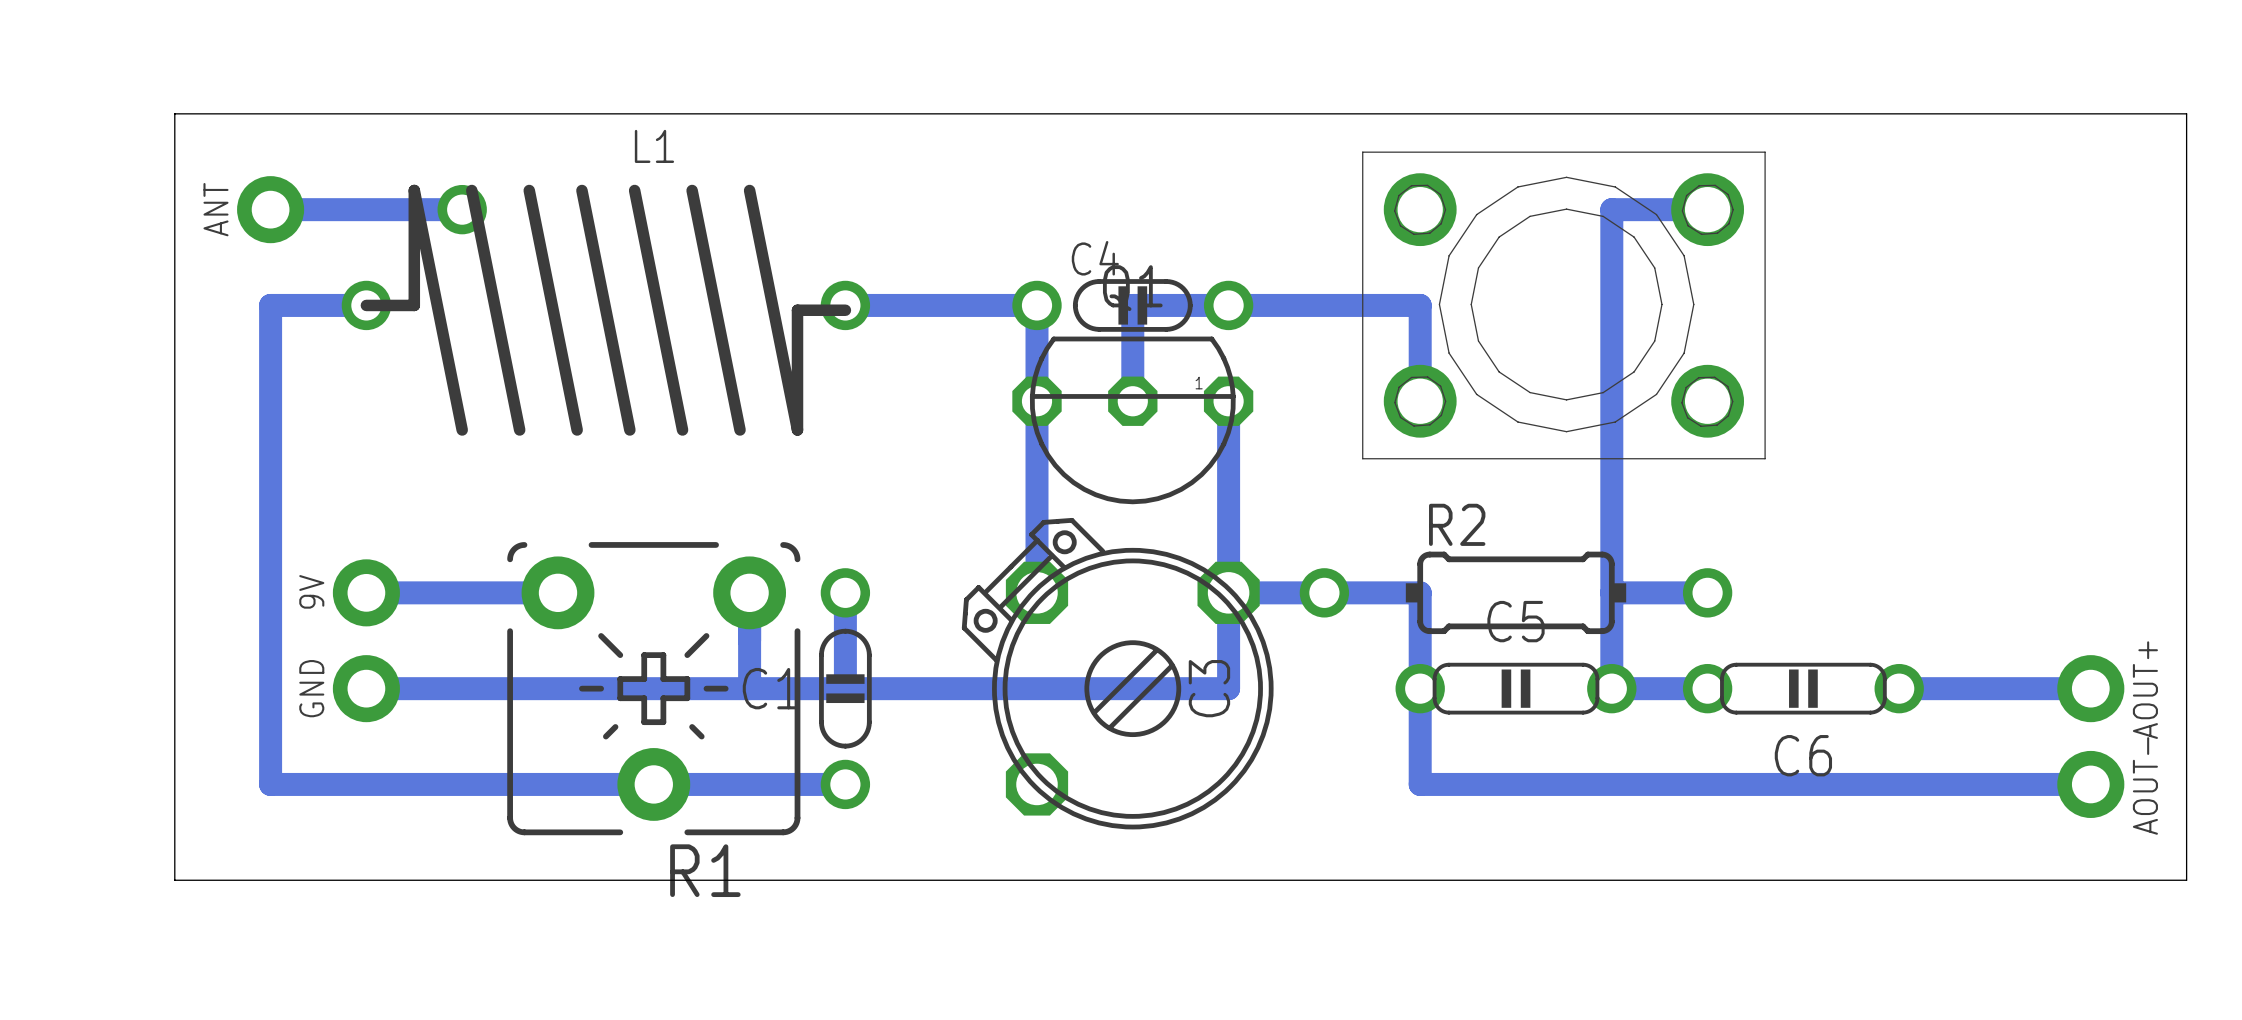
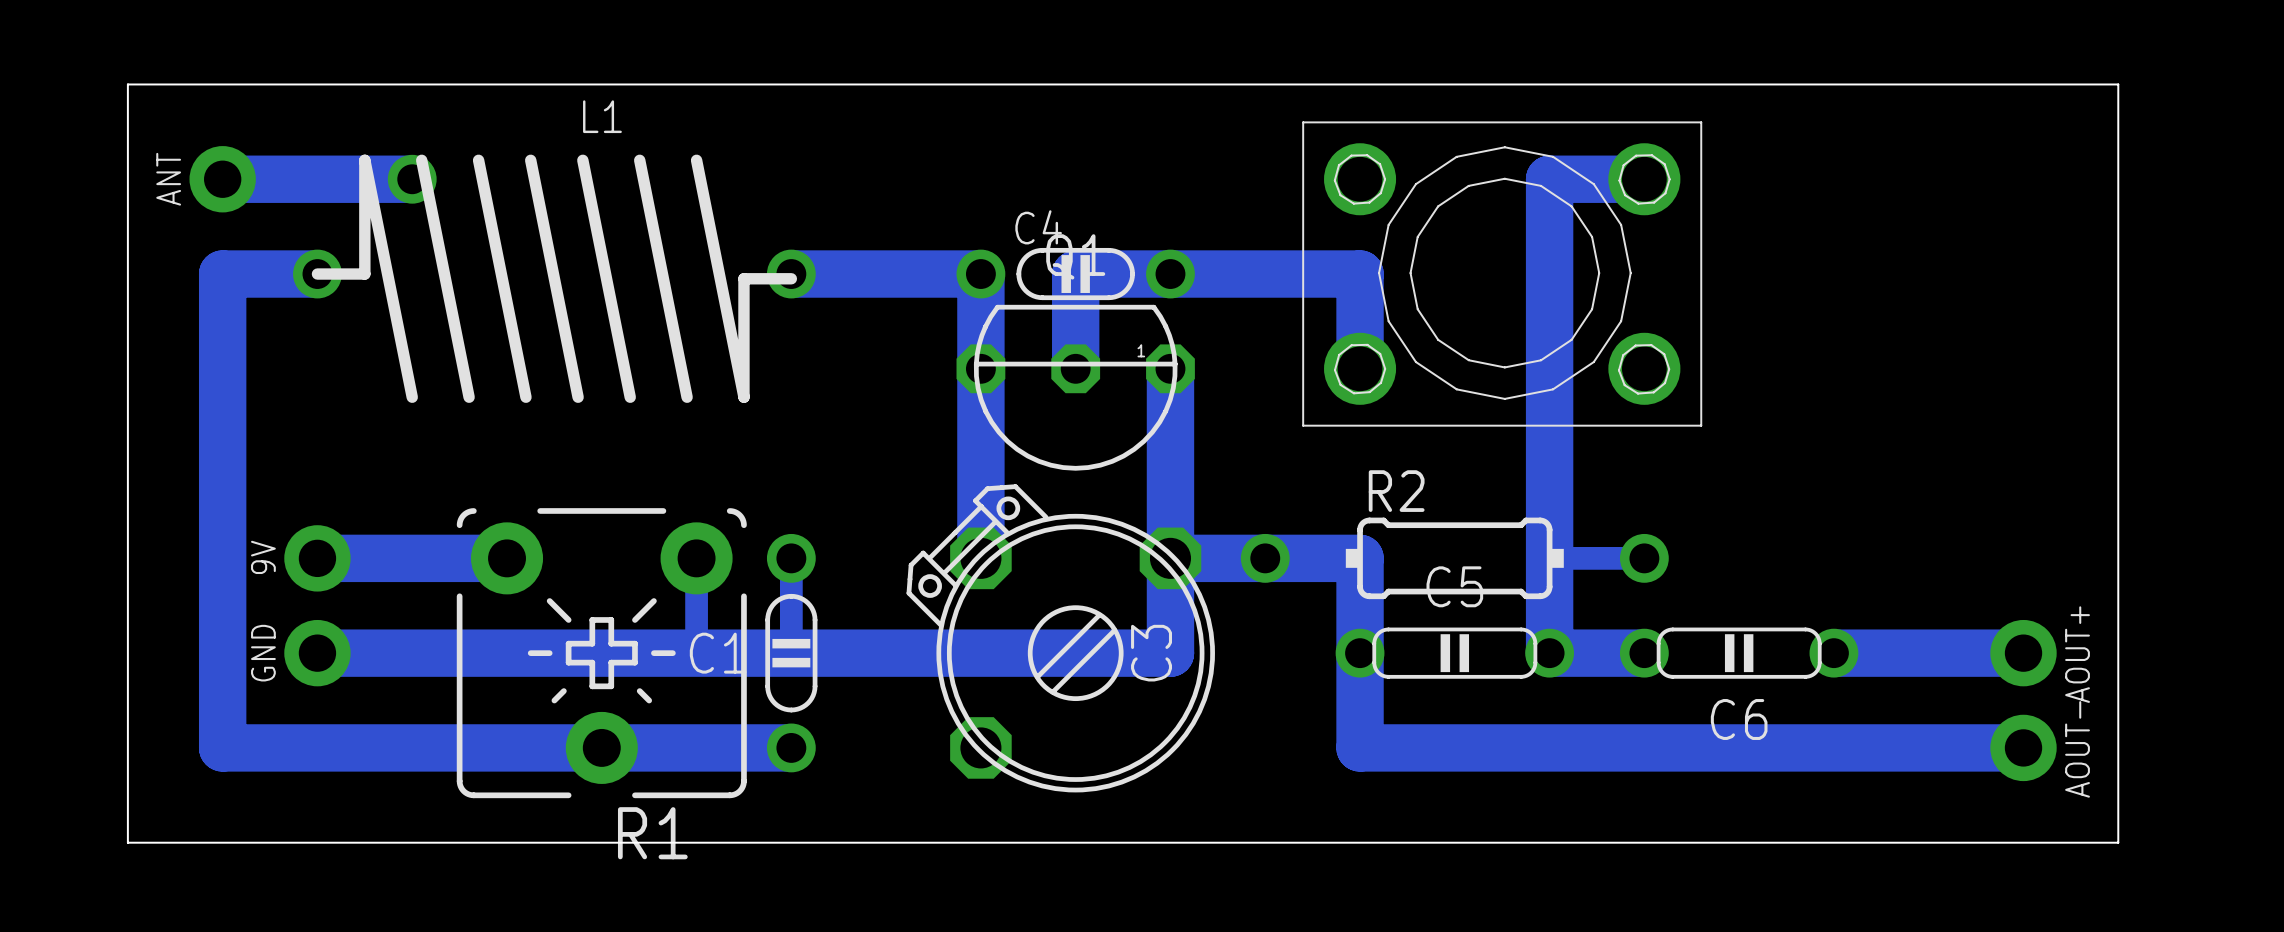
bottom track width: thin (270, 209) (462, 209) -> thick (222, 179) (412, 179)
bottom track width: thin (1707, 209) (1611, 209) (1611, 688) (1707, 688) -> thick (1644, 179) (1549, 179) (1549, 653) (1644, 653)
bottom track width: thin (366, 305) (270, 305) (270, 784) (845, 784) -> thick (317, 274) (222, 274) (222, 747) (791, 747)
bottom track width: thin (845, 305) (1037, 305) (1037, 592) -> thick (791, 274) (980, 274) (980, 558)
bottom track width: thin (1132, 401) (1132, 305) (1420, 305) (1420, 401) -> thick (1075, 368) (1075, 274) (1360, 274) (1360, 368)
bottom track width: thin (1228, 401) (1228, 688) (366, 688) -> thick (1170, 368) (1170, 653) (317, 653)
bottom track width: thin (366, 592) (558, 592) -> thick (317, 558) (507, 558)
bottom track width: thin (1228, 592) (1420, 592) (1420, 784) (2090, 784) -> thick (1170, 558) (1360, 558) (1360, 747) (2023, 747)
bottom track width: thin (1899, 688) (2090, 688) -> thick (1833, 653) (2023, 653)

